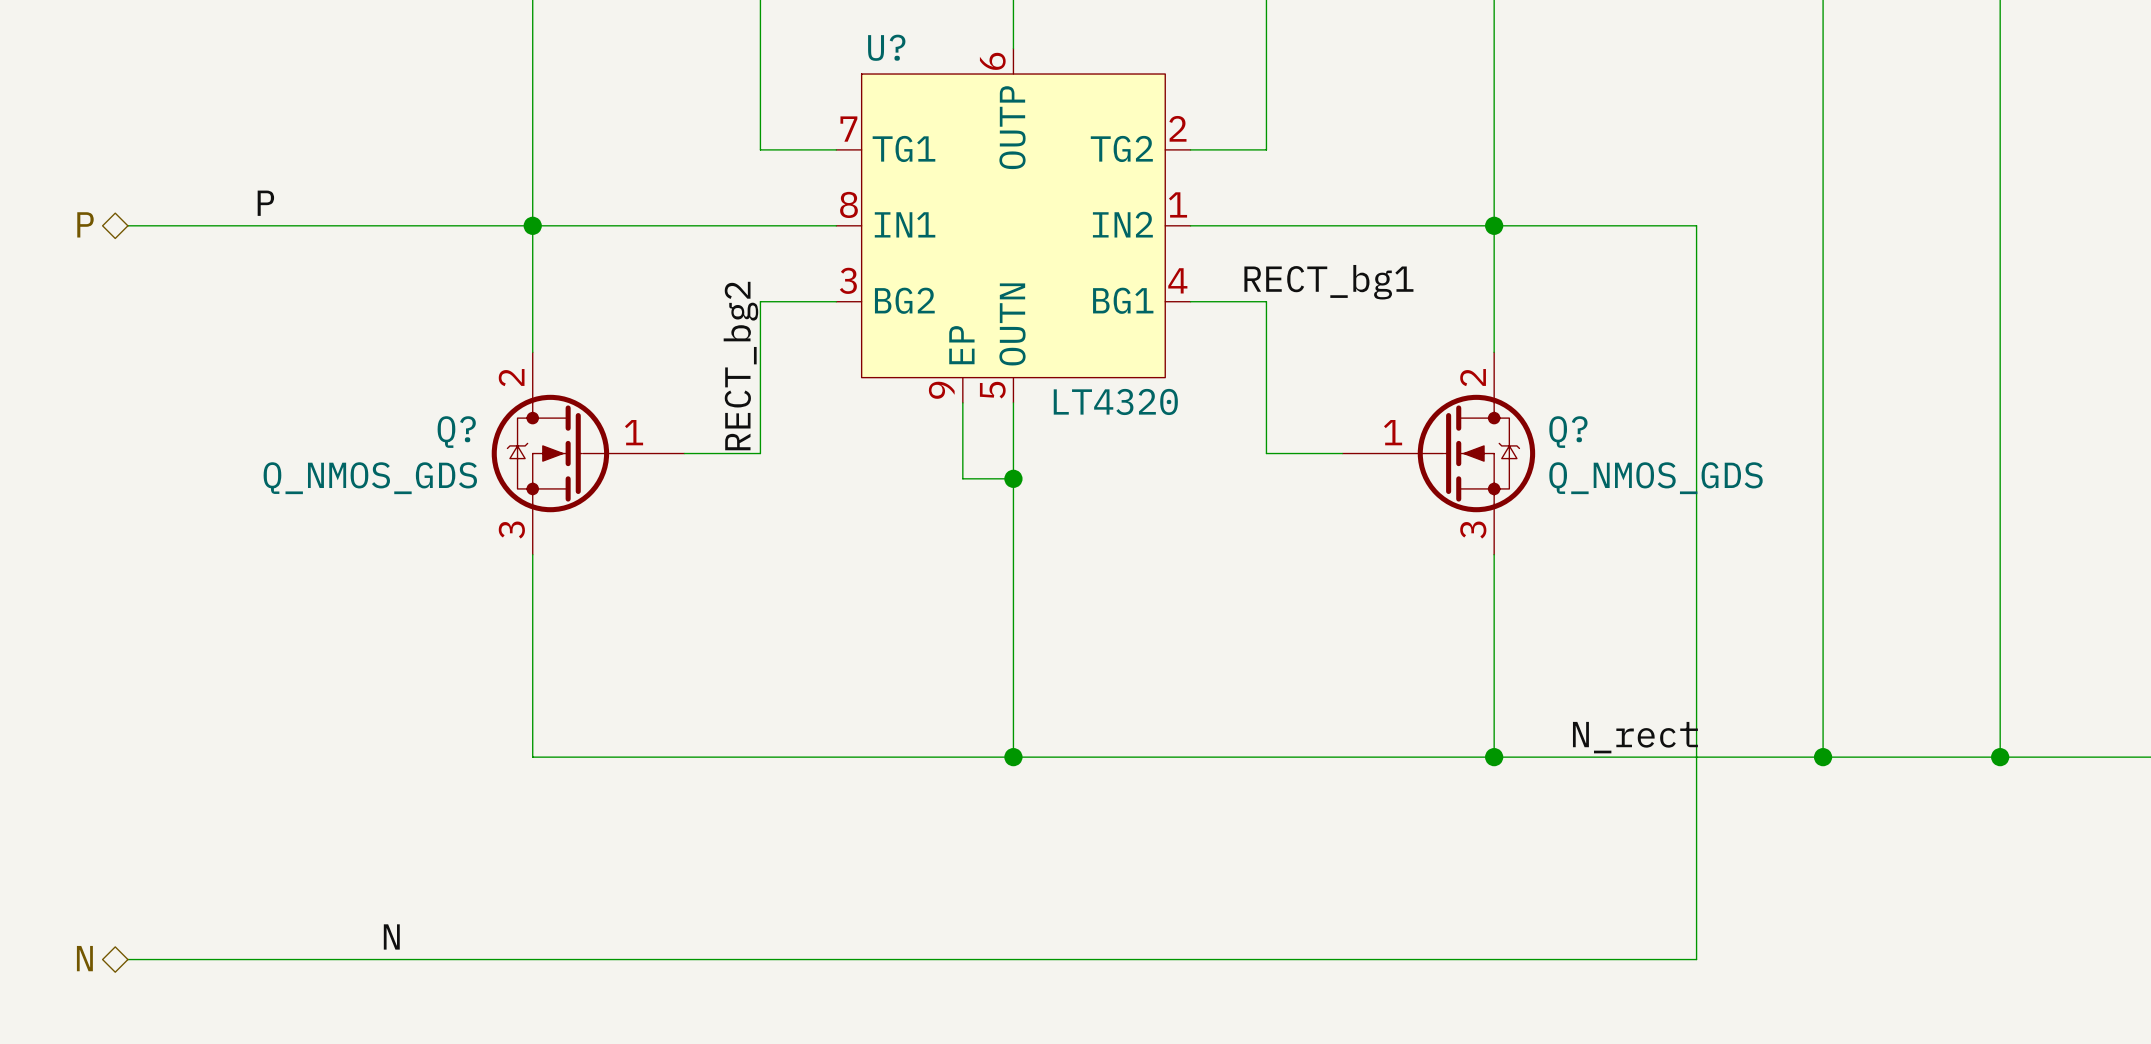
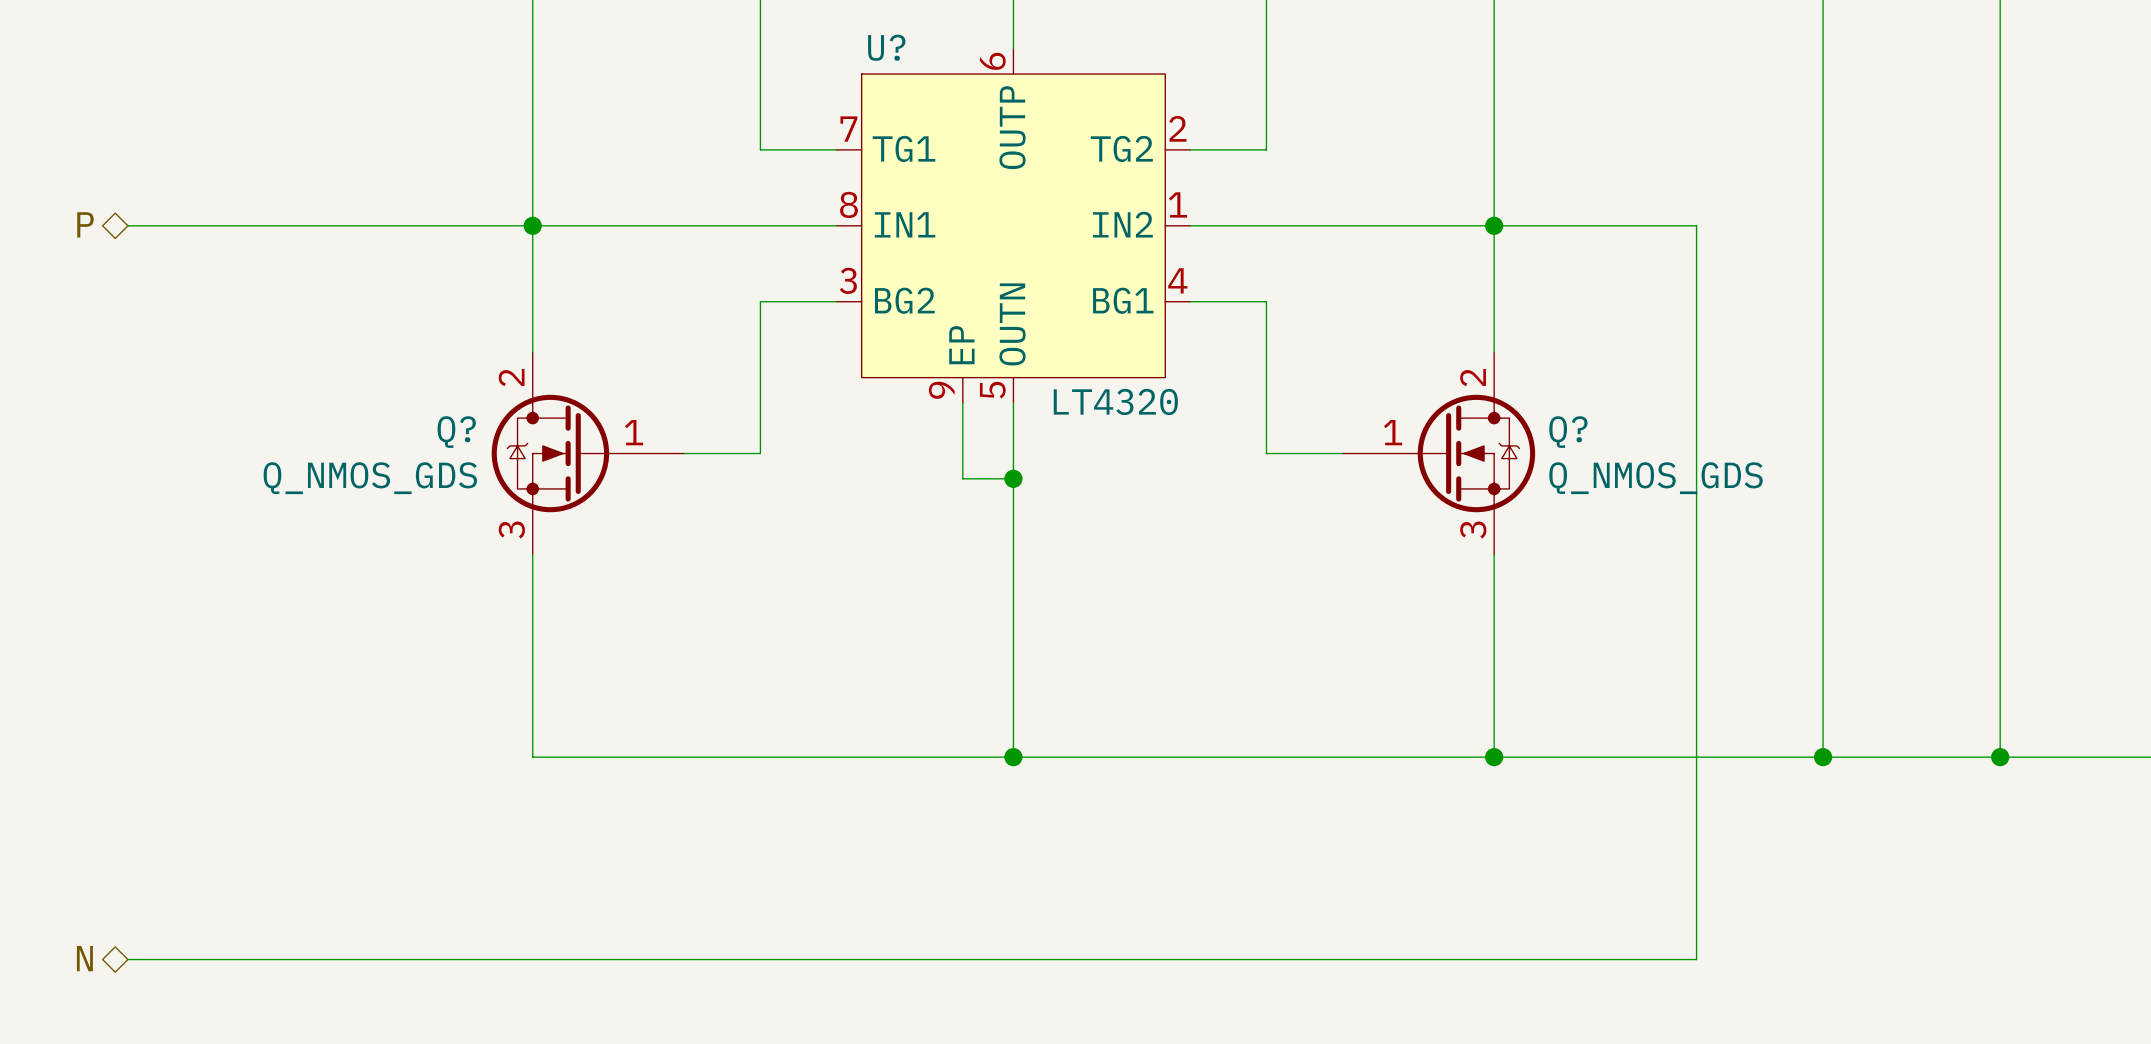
label: P (265, 203) -> none
label: RECT_bg1 (1328, 282) -> none
label: RECT_bg2 (740, 366) -> none
label: N_rect (1635, 737) -> none
label: N (391, 936) -> none

